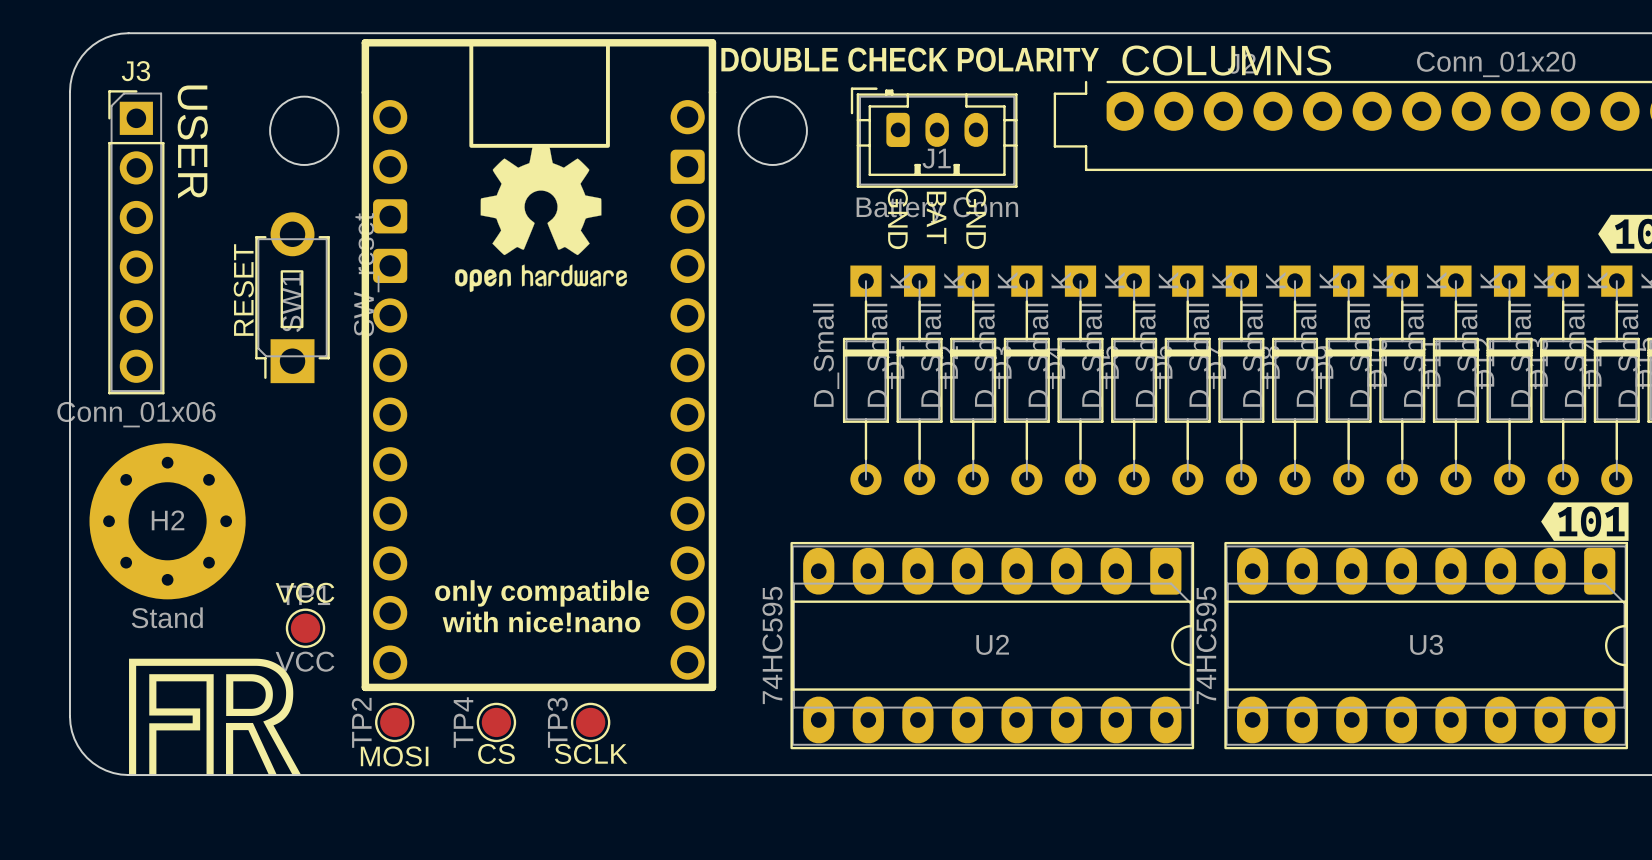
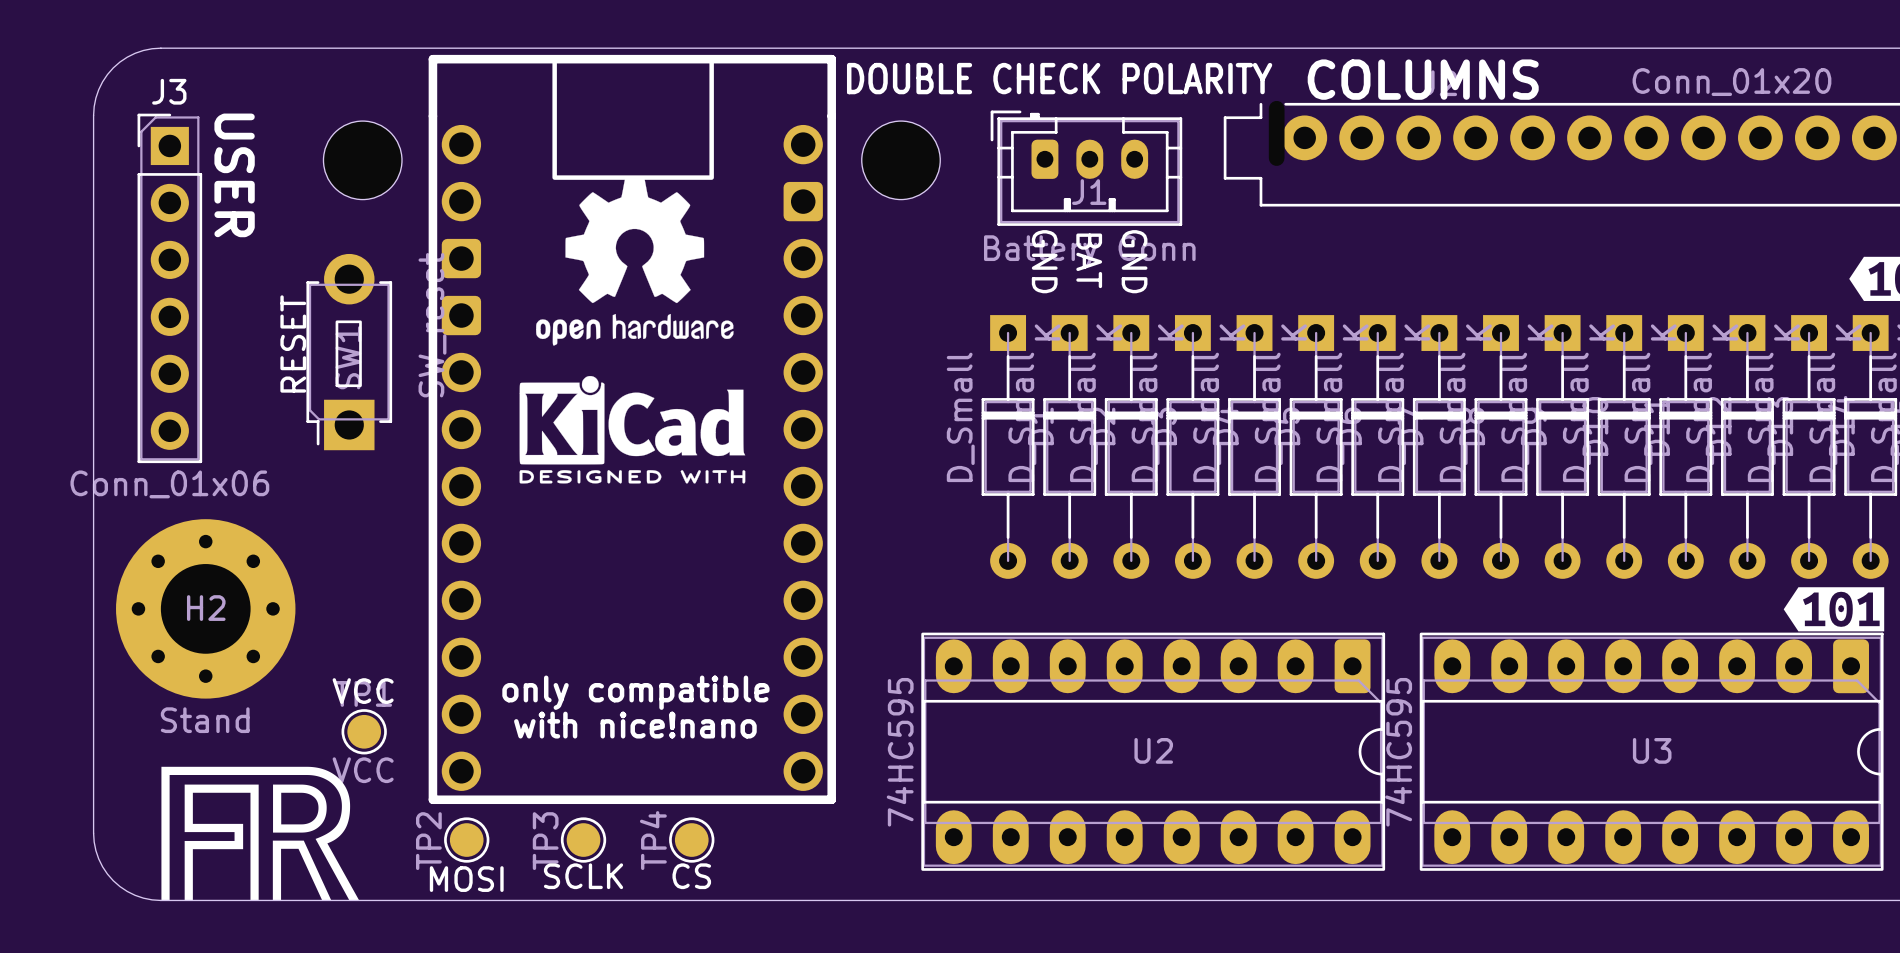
drawing: none -> [519, 375, 746, 484]
TP4 name: TP4 (463, 722) -> TP3 (545, 841)
TP3 name: TP3 (557, 722) -> TP4 (653, 840)
TP4 value: CS (496, 753) -> SCLK (583, 876)
TP3 value: SCLK (591, 753) -> CS (691, 876)

